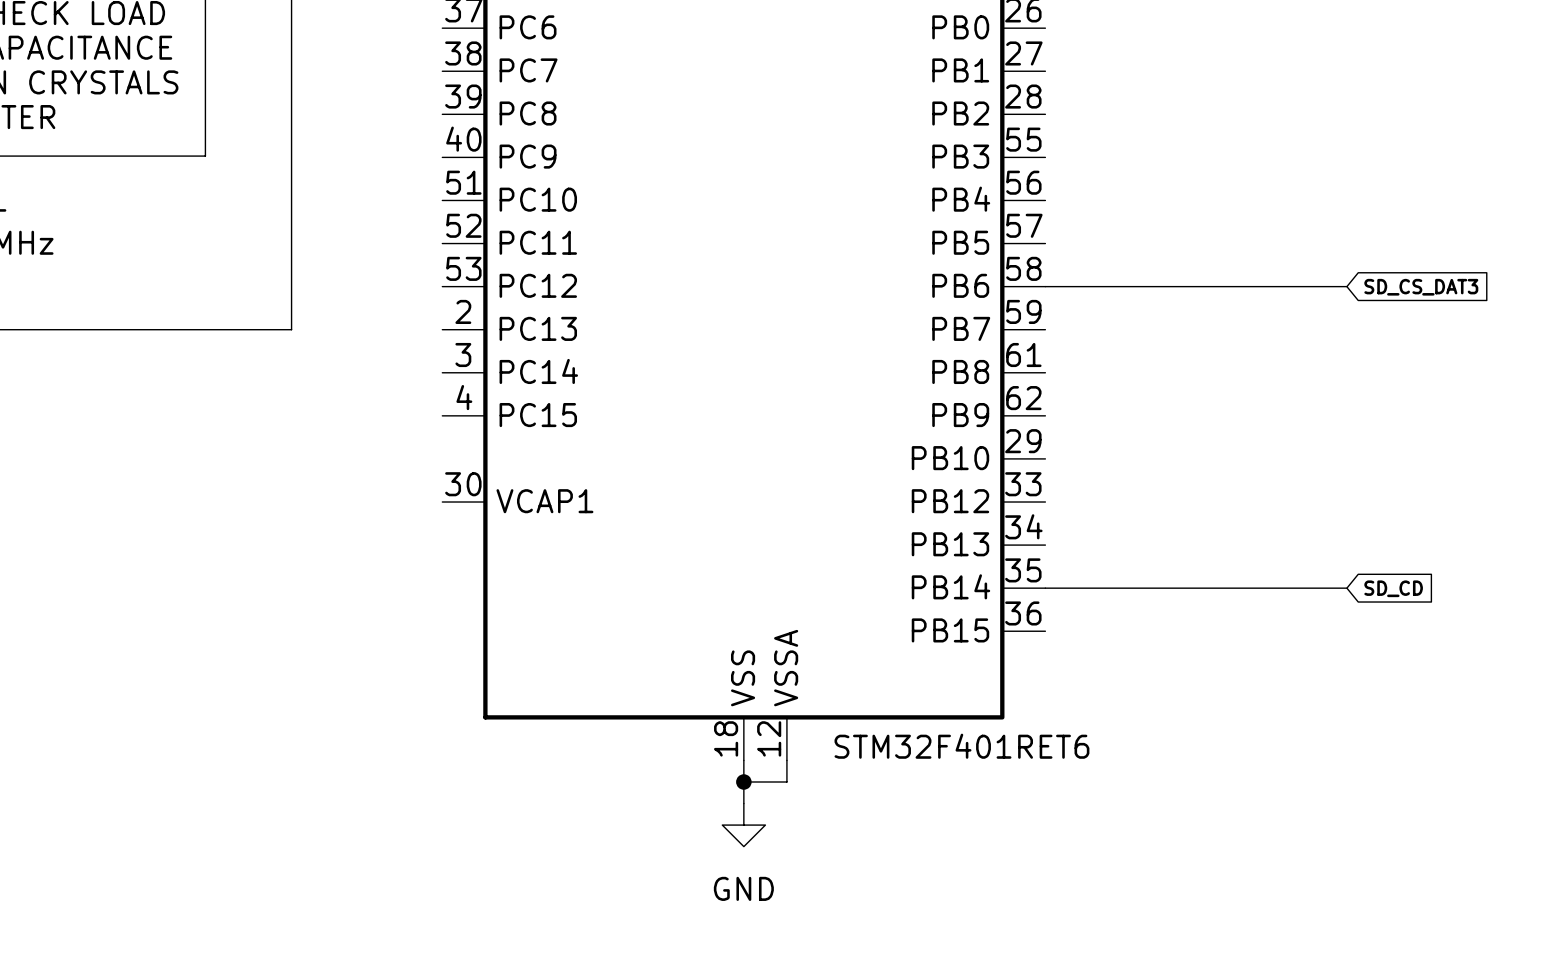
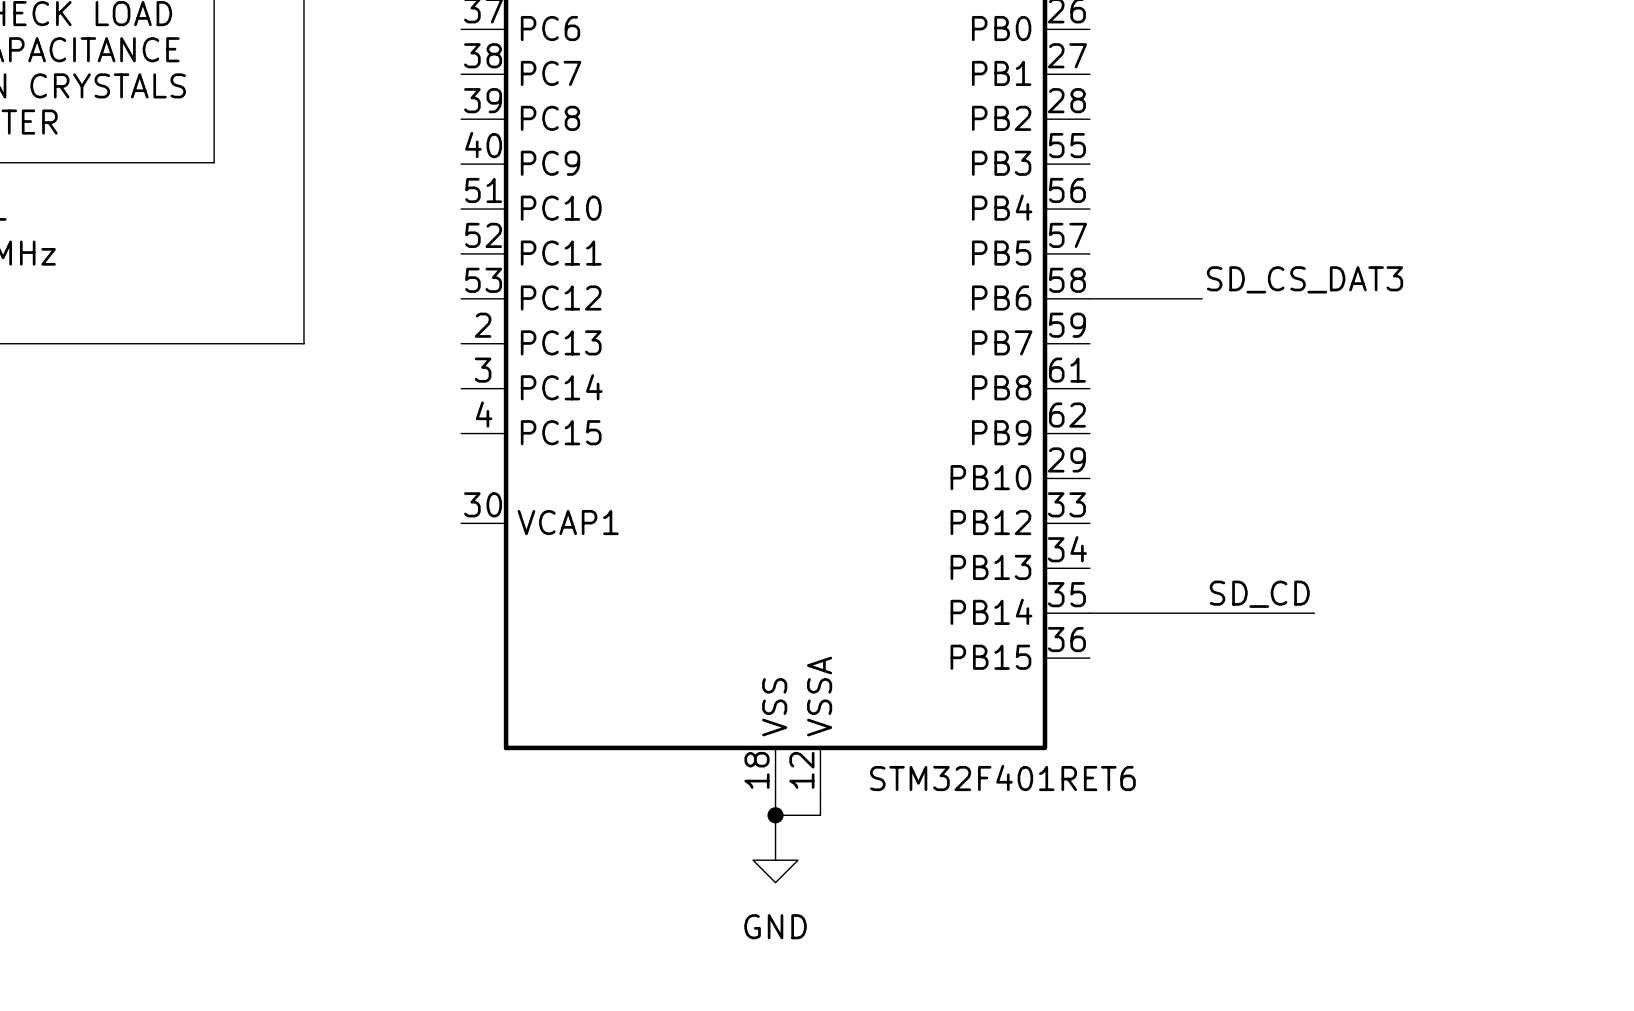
label: none -> SD_CS_DAT3 (1305, 279)
wire: (1153, 286) (1346, 286) -> none
global label: SD_CS_DAT3 (1421, 287) -> none
label: none -> SD_CD (1259, 594)
wire: (1260, 588) (1346, 588) -> none
global label: SD_CD (1393, 588) -> none

